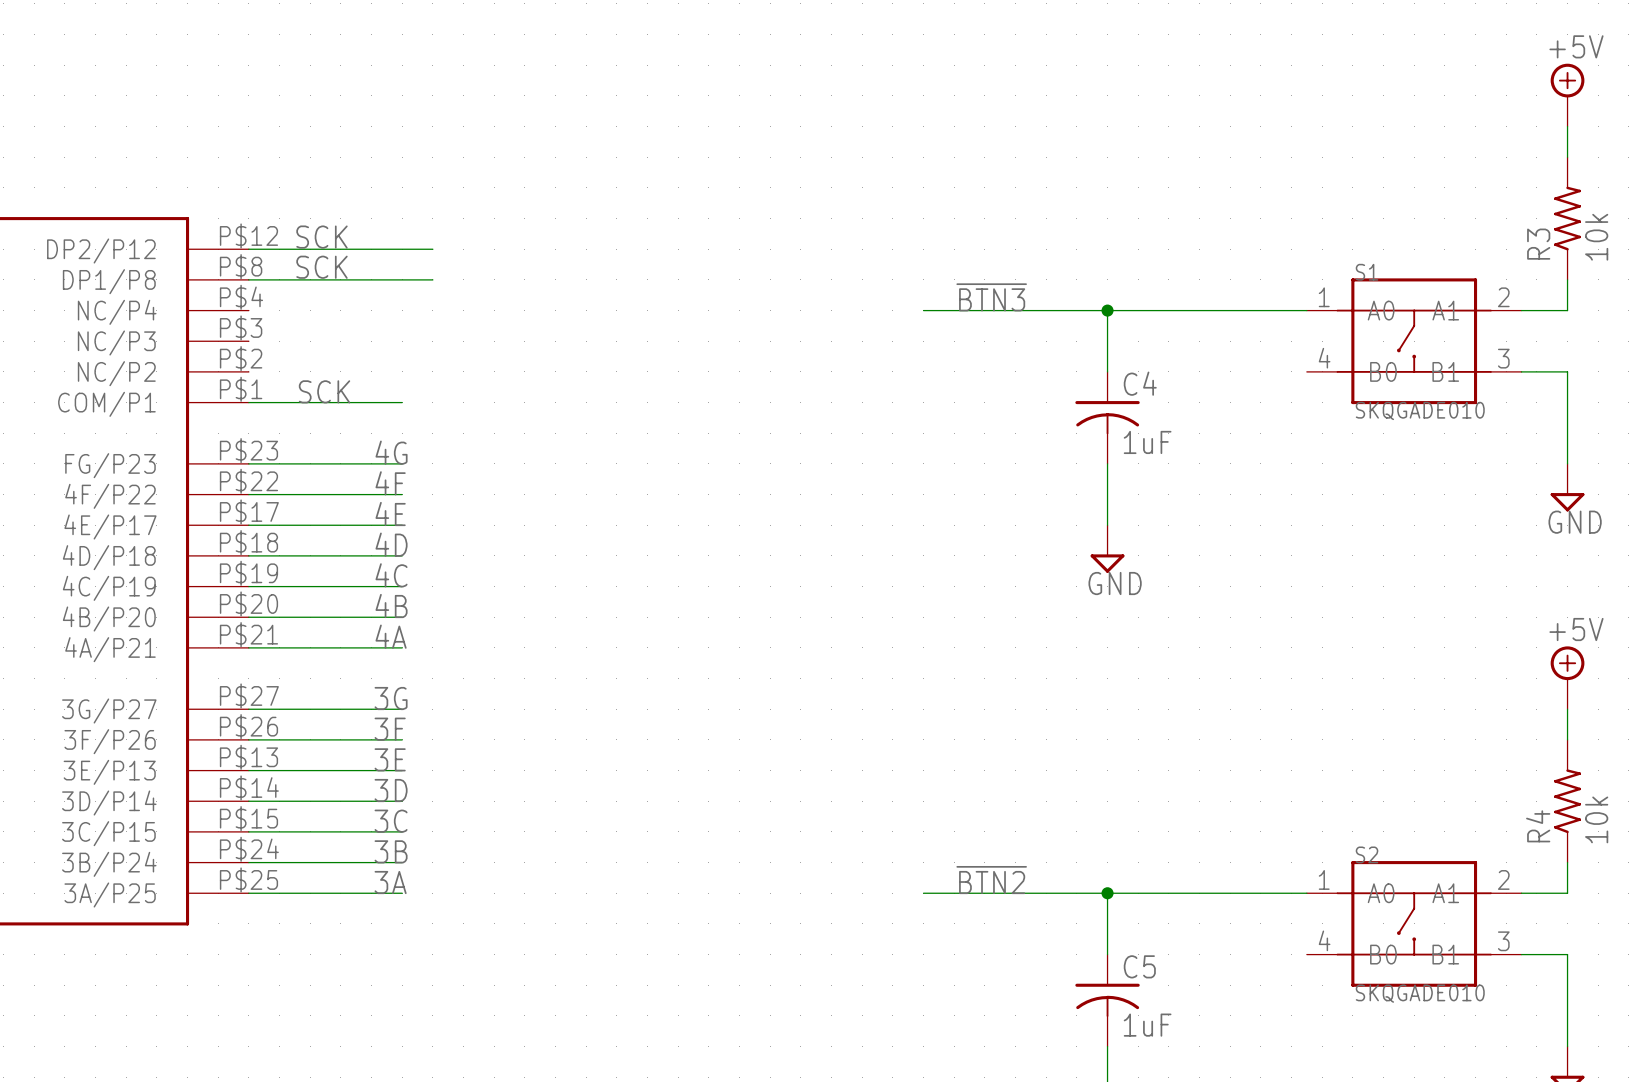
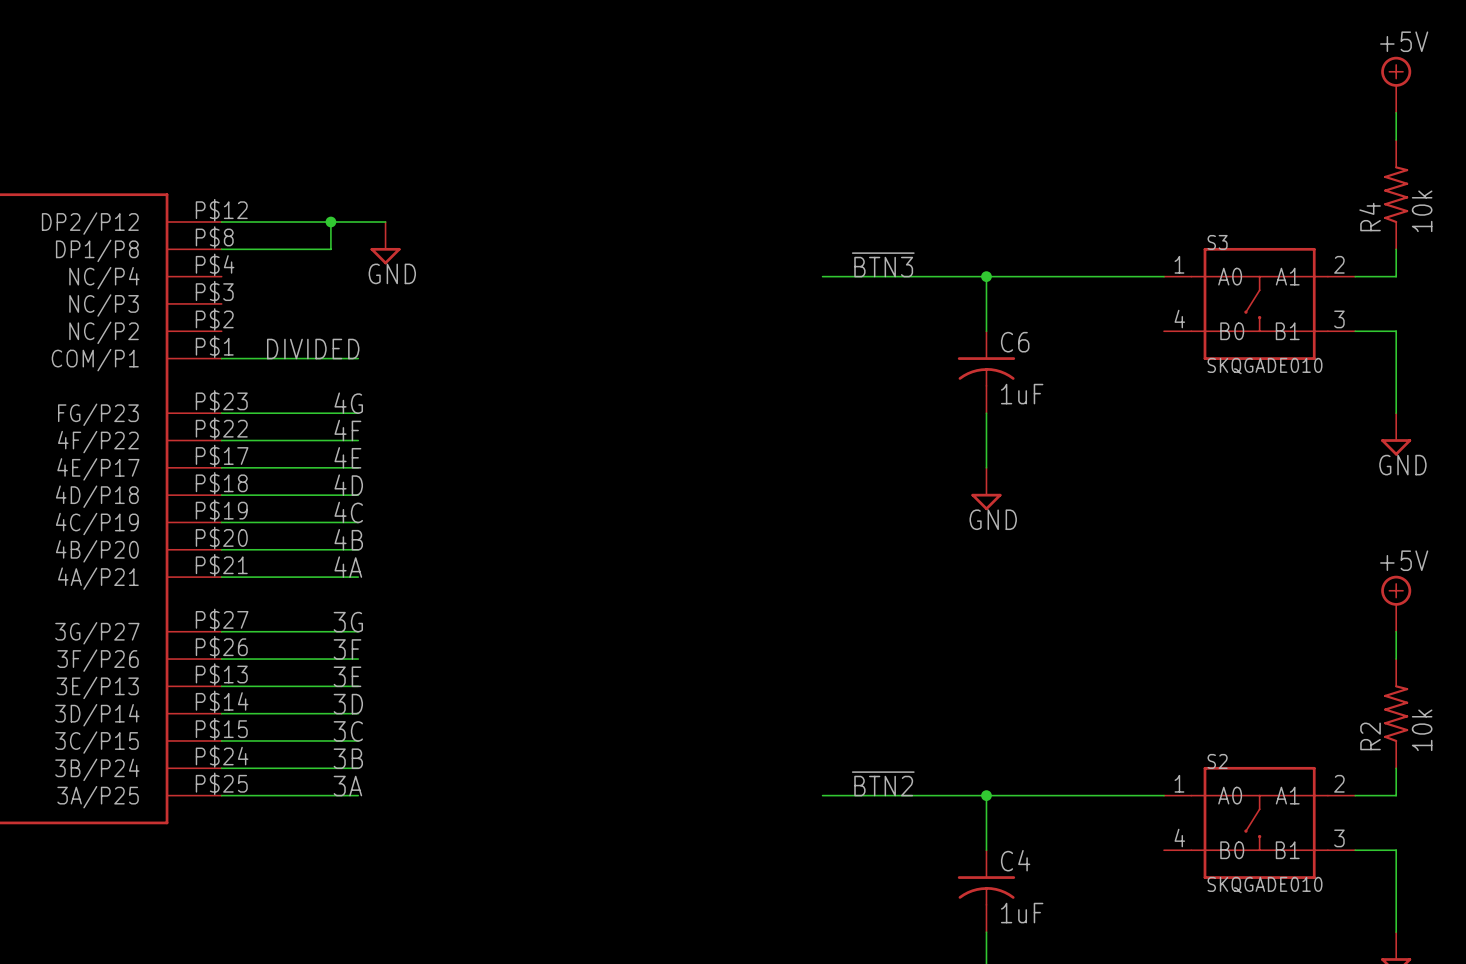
label: SCK (321, 237) -> none
R3 name: R3 (1538, 244) -> R4 (1370, 217)
junction: none -> (330, 222)
label: SCK (321, 267) -> none
S1 name: S1 (1367, 272) -> S3 (1217, 242)
power symbol: none -> GND (385, 243)
wire: (371, 279) (432, 279) -> (330, 249) (330, 222)
C4 name: C4 (1140, 383) -> C6 (1015, 342)
label: SCK (324, 391) -> DIVIDED (313, 349)
R4 name: R4 (1538, 826) -> R2 (1370, 736)
C5 name: C5 (1139, 966) -> C4 (1015, 860)

